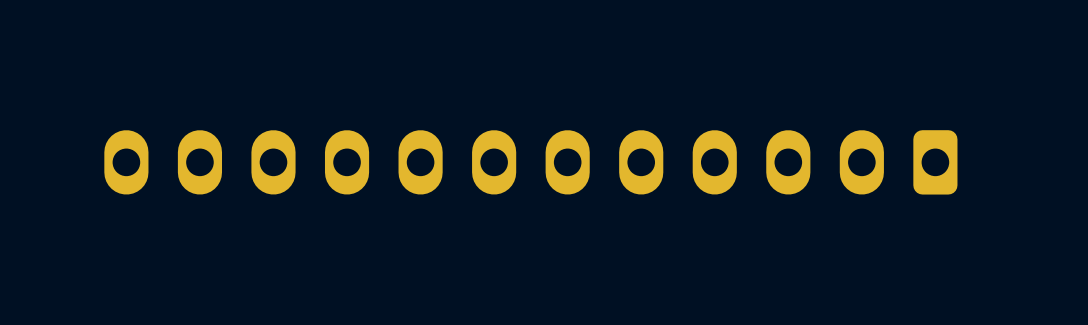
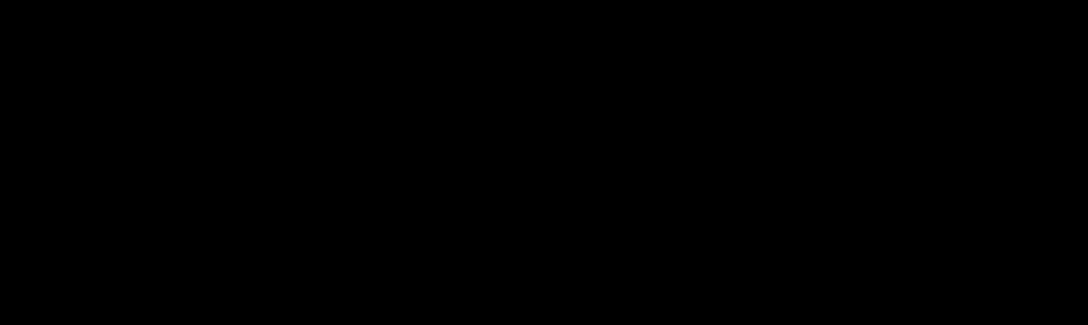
part: (530, 162) -> none

